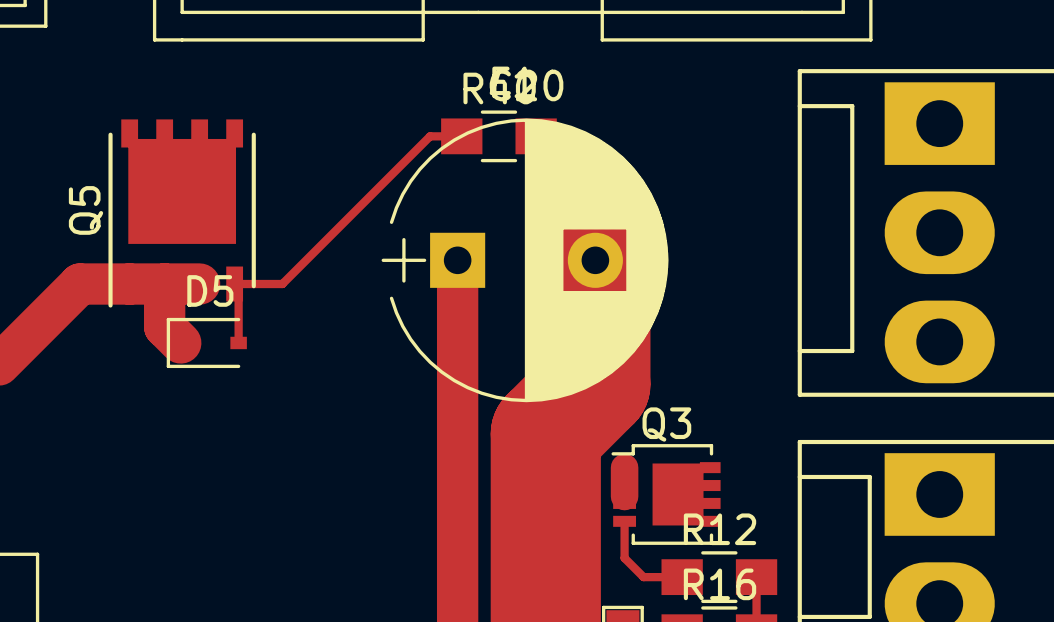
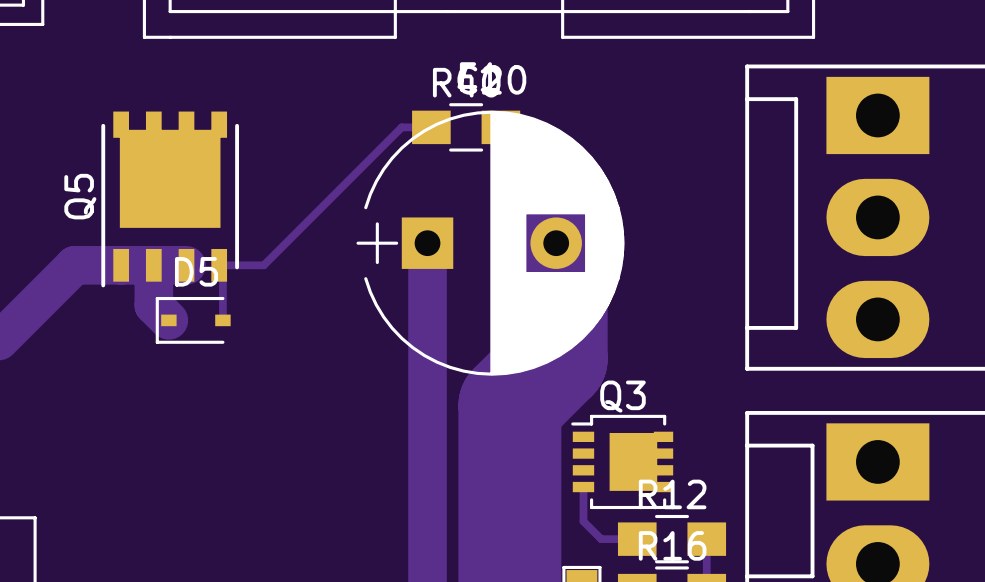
track: (624, 467) (624, 496) -> none

